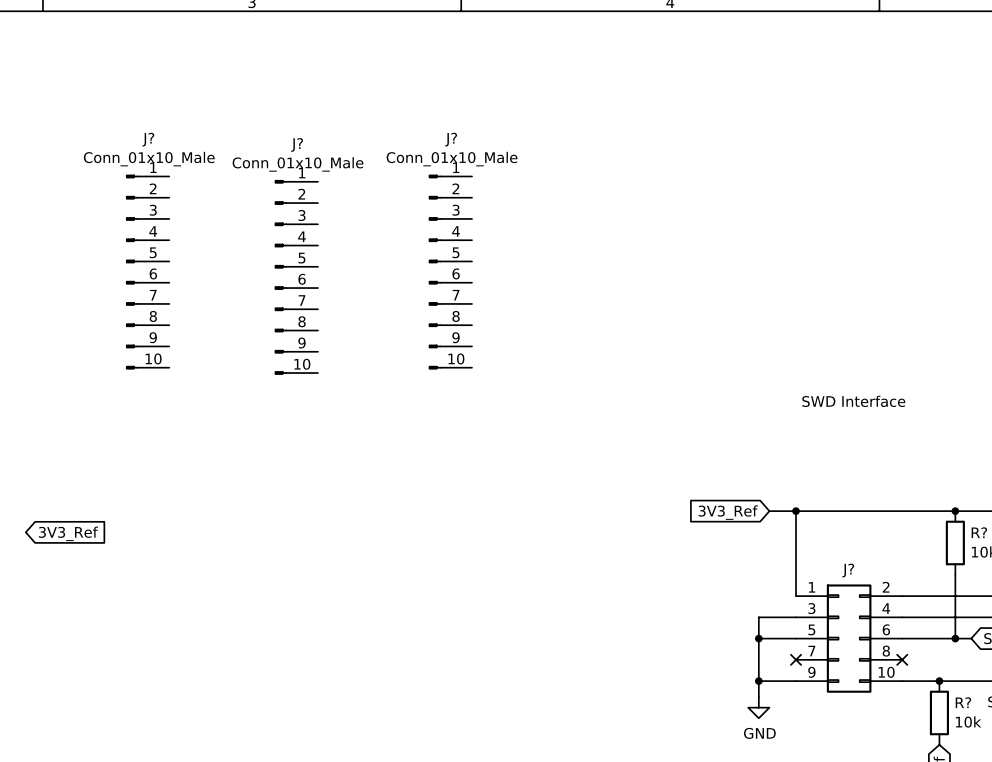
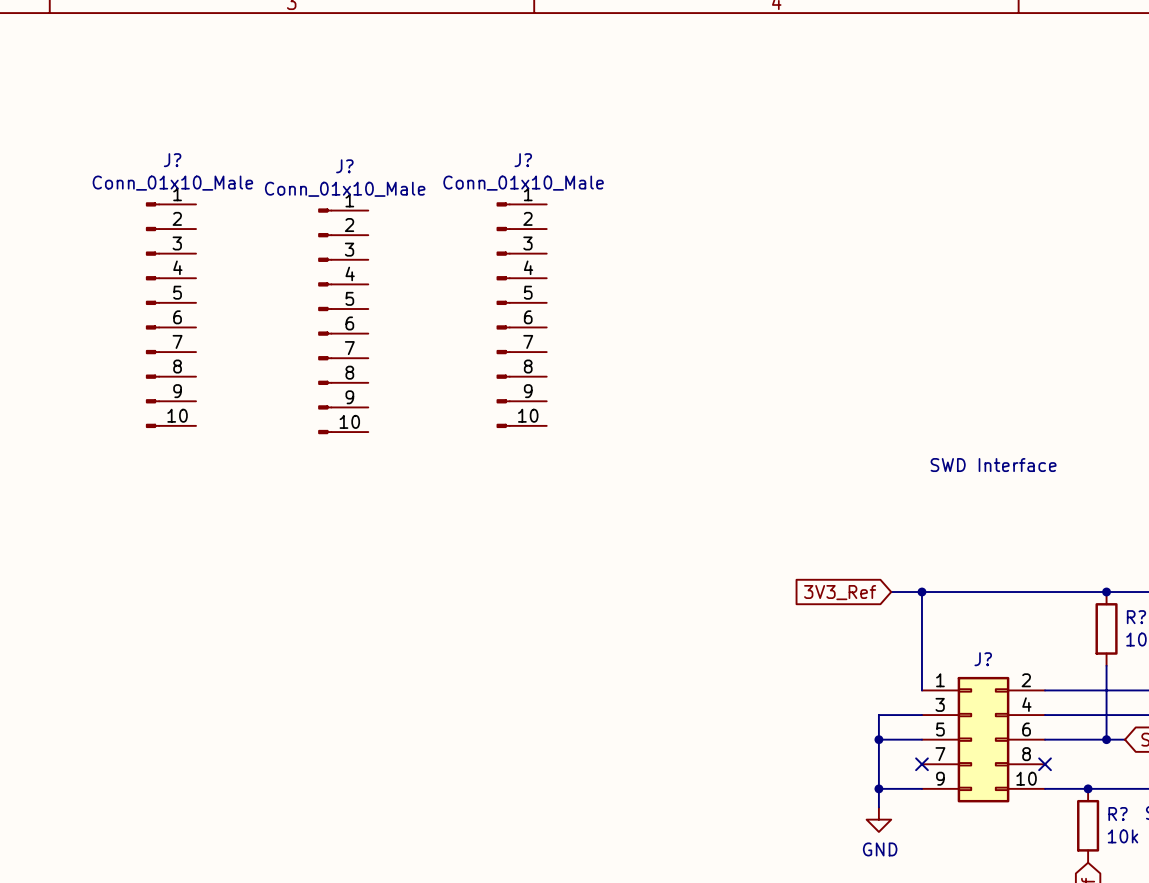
global label: 3V3_Ref (68, 533) -> none

